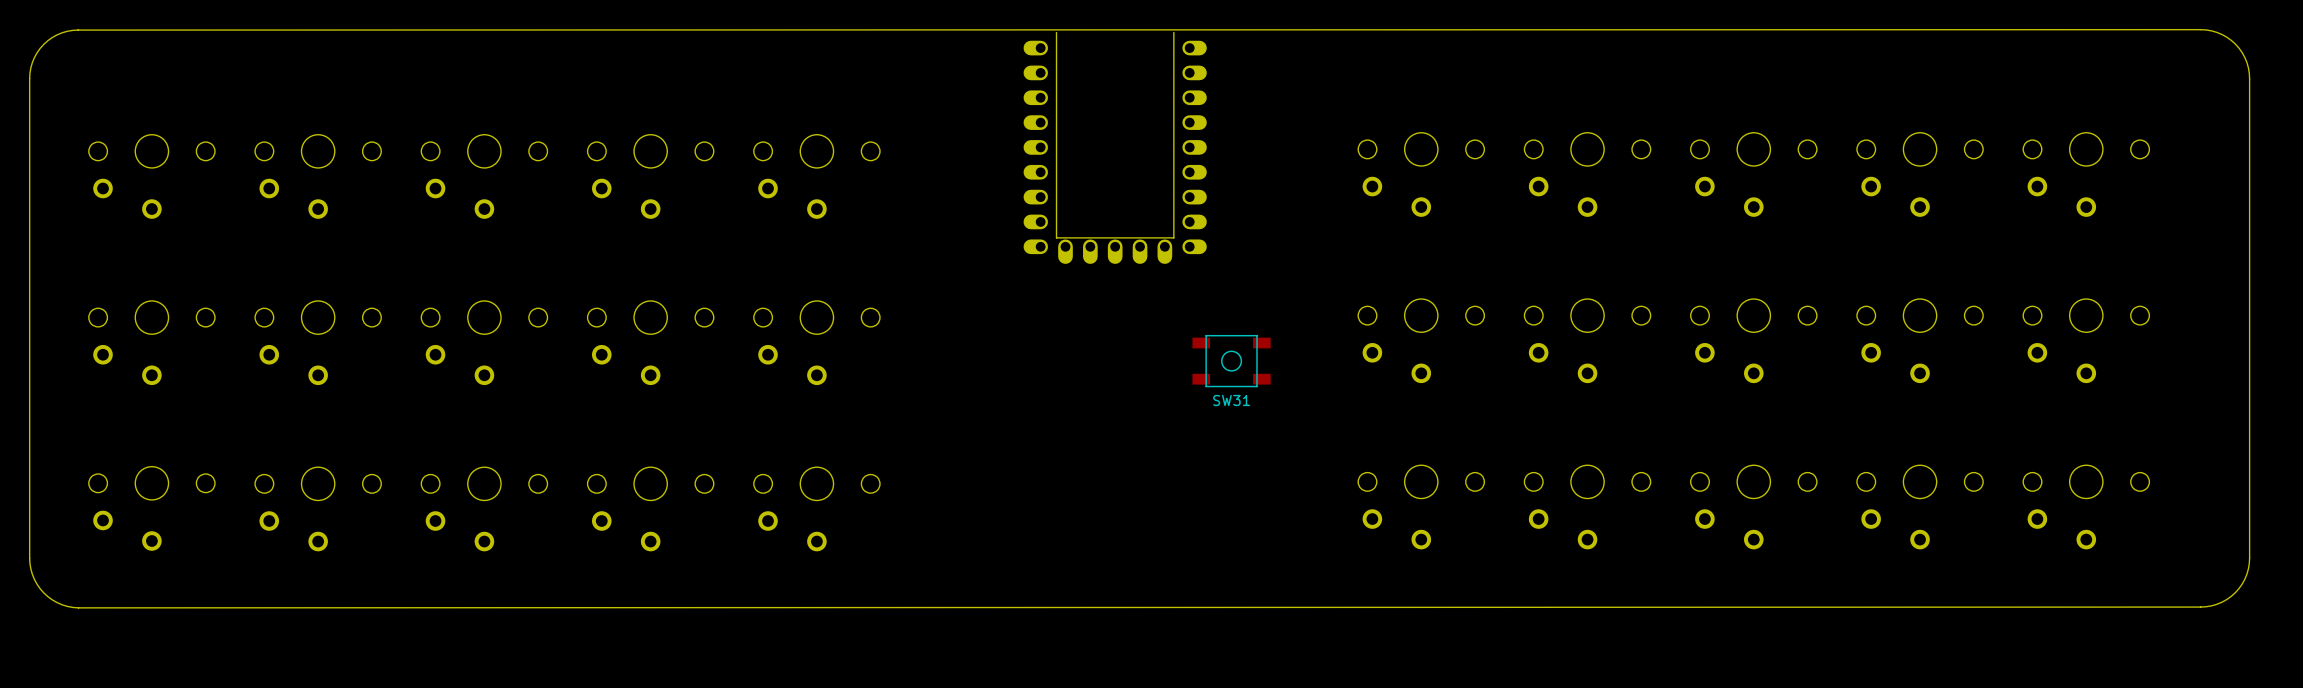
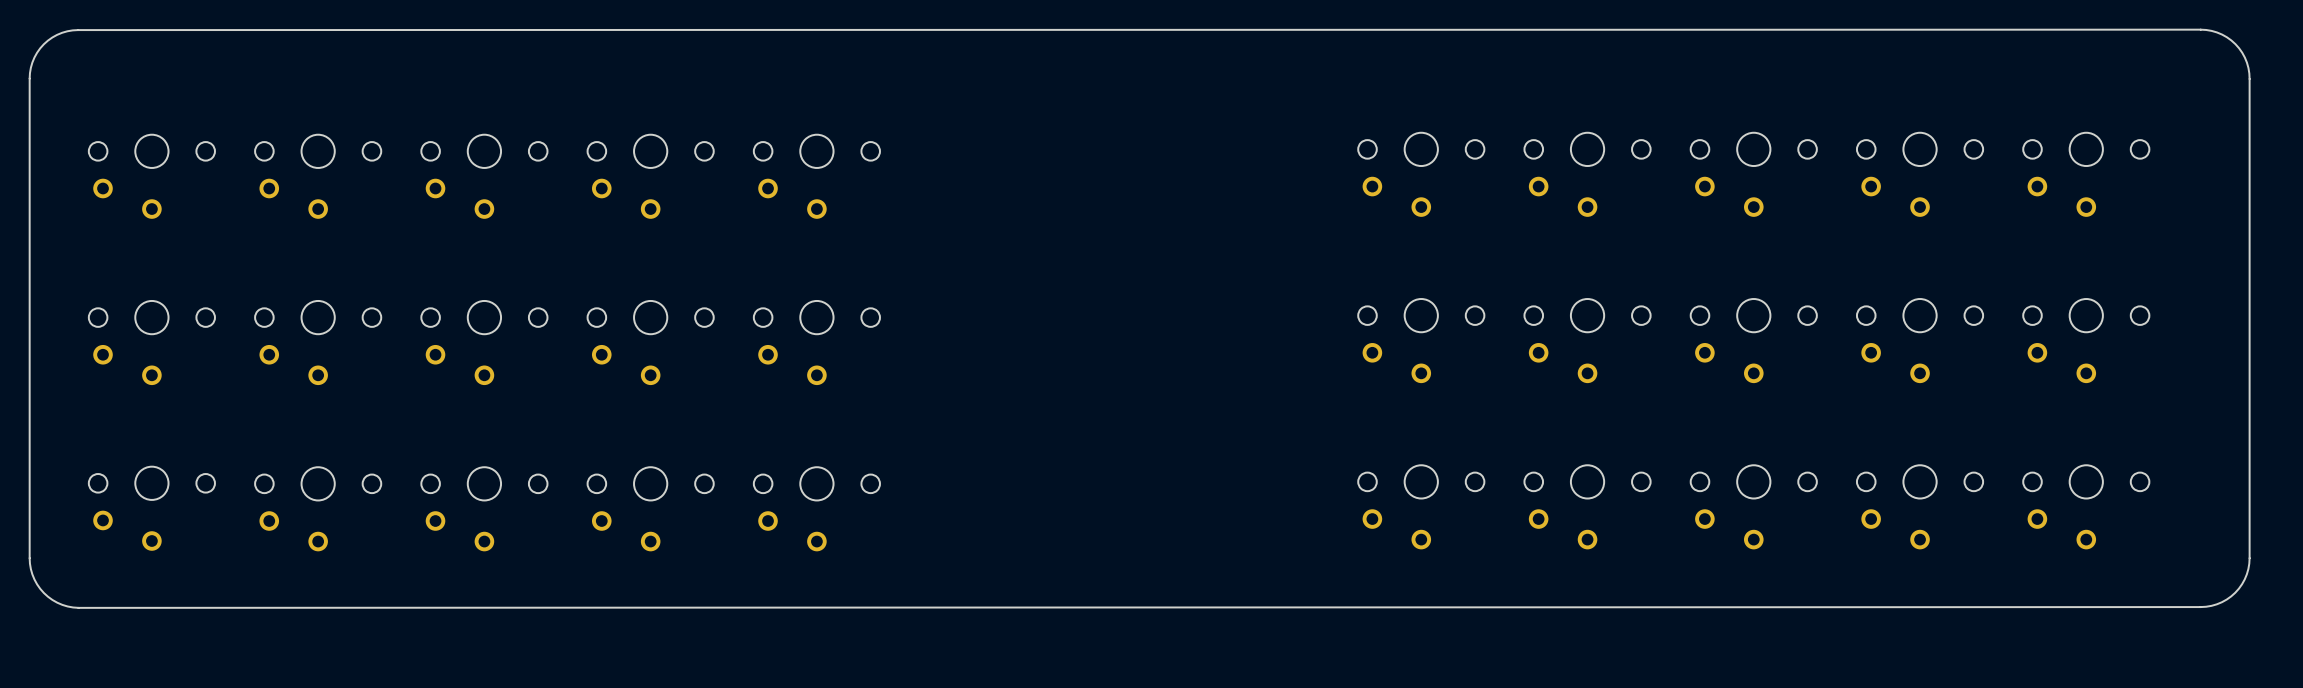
part: (1115, 147) -> none
SW31: (1231, 361) -> none

